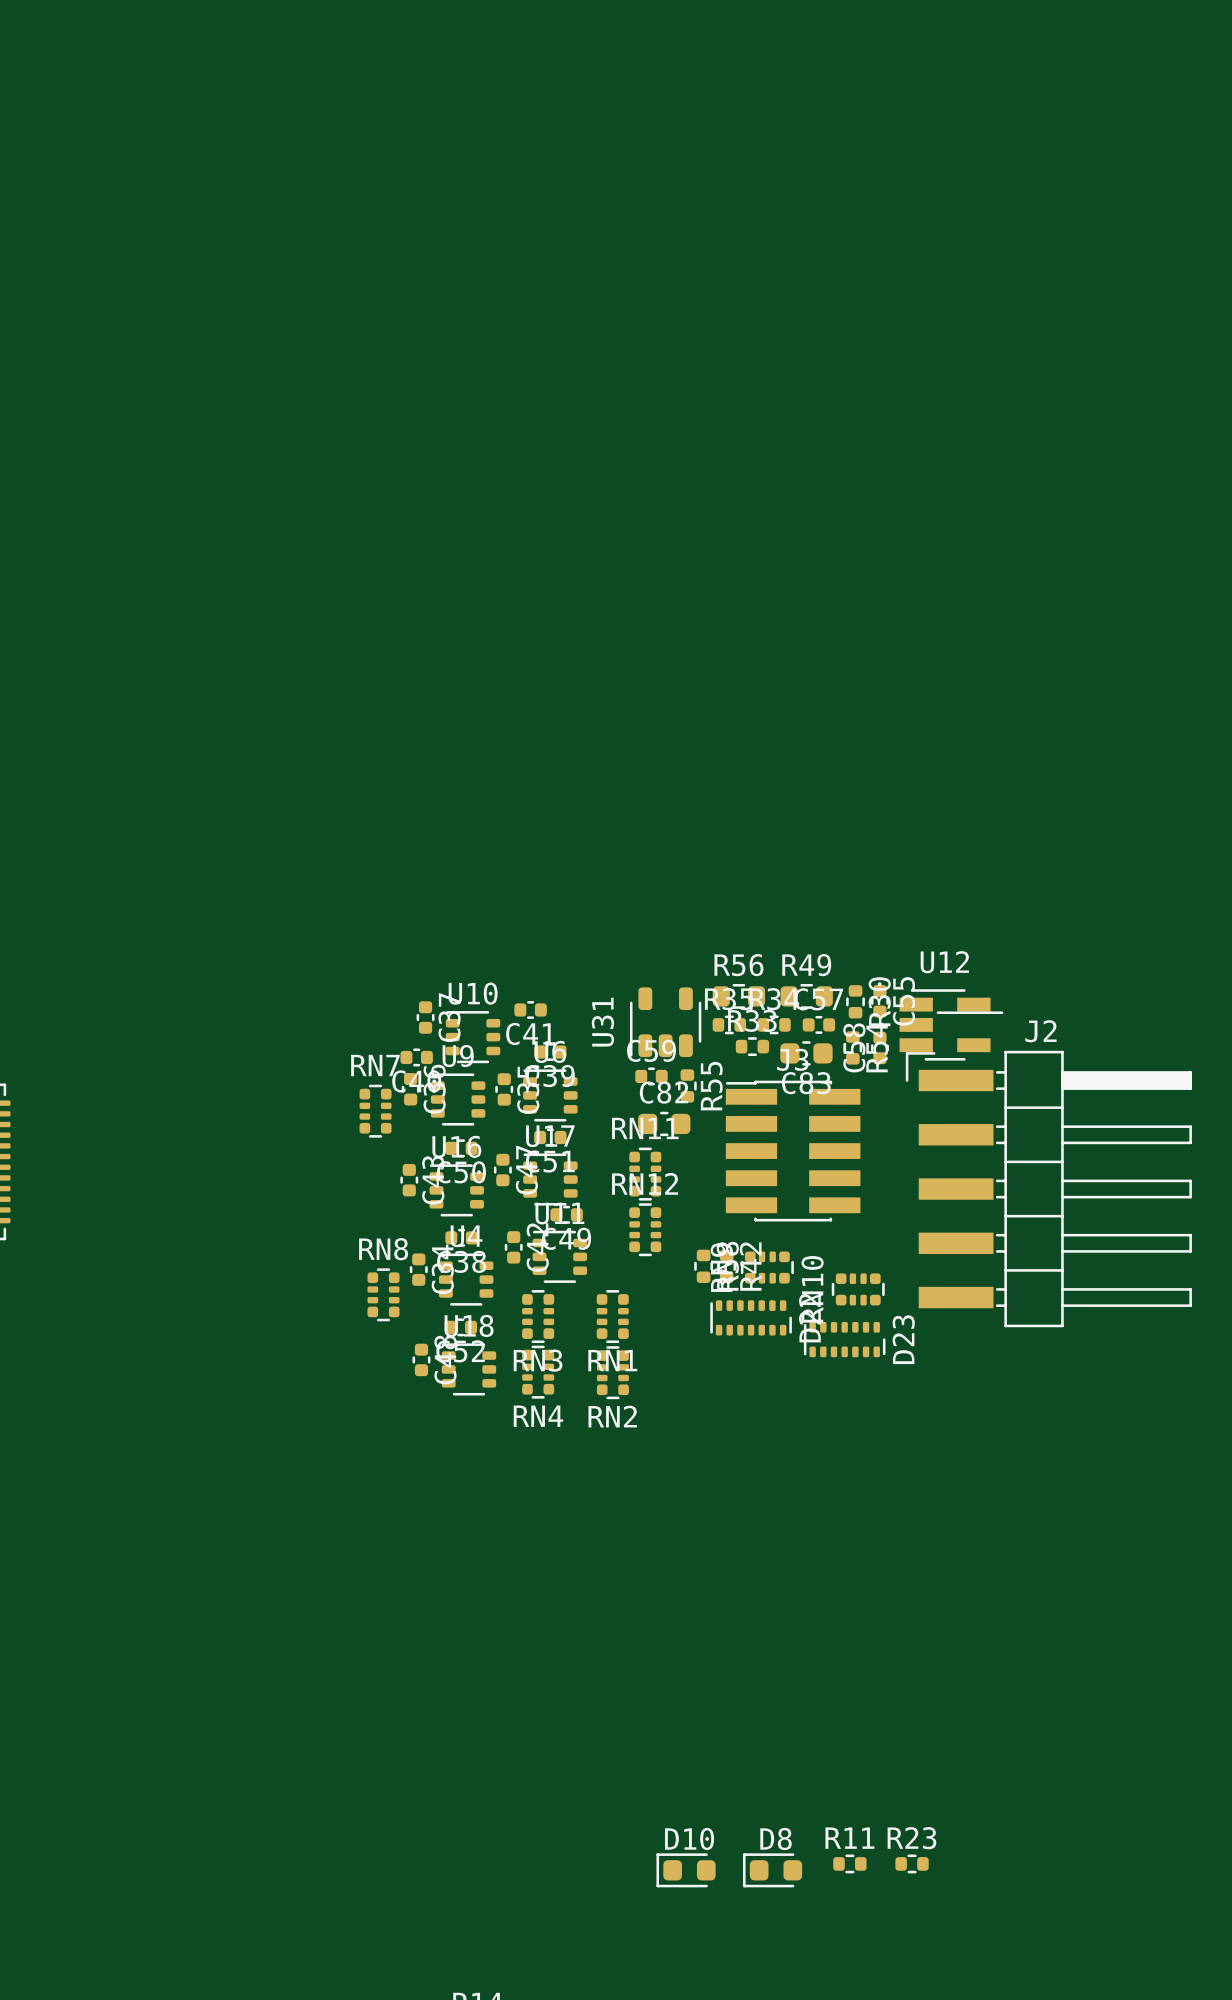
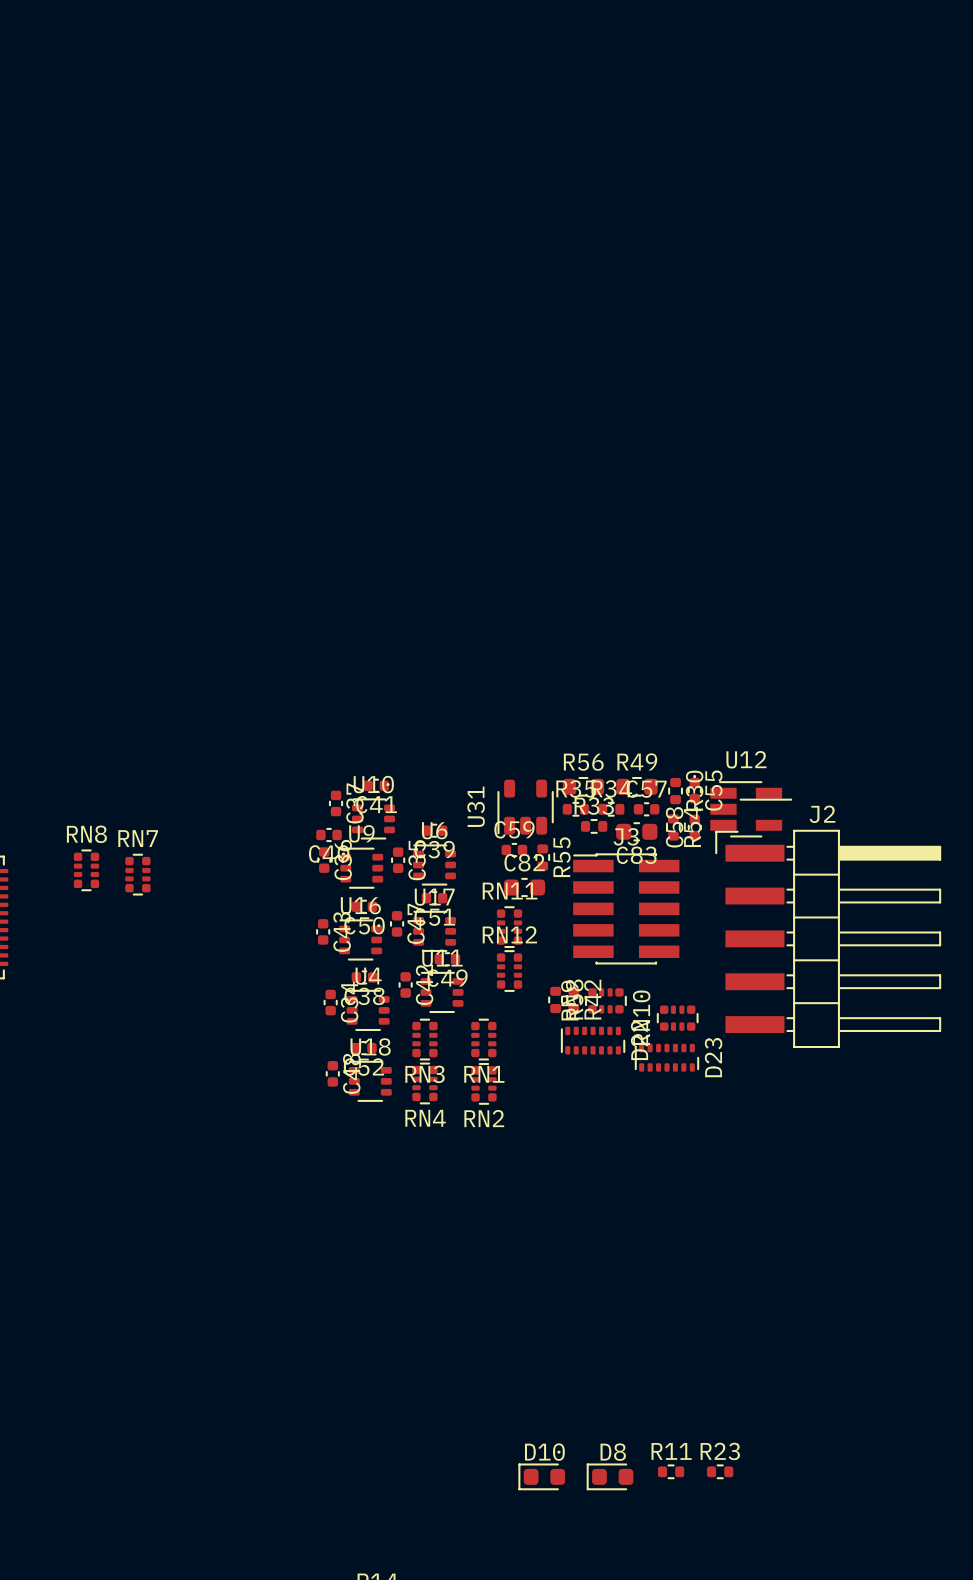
C41 position: (530, 1009) -> (376, 785)
RN7 position: (375, 1111) -> (137, 874)
RN8 position: (383, 1294) -> (86, 870)

